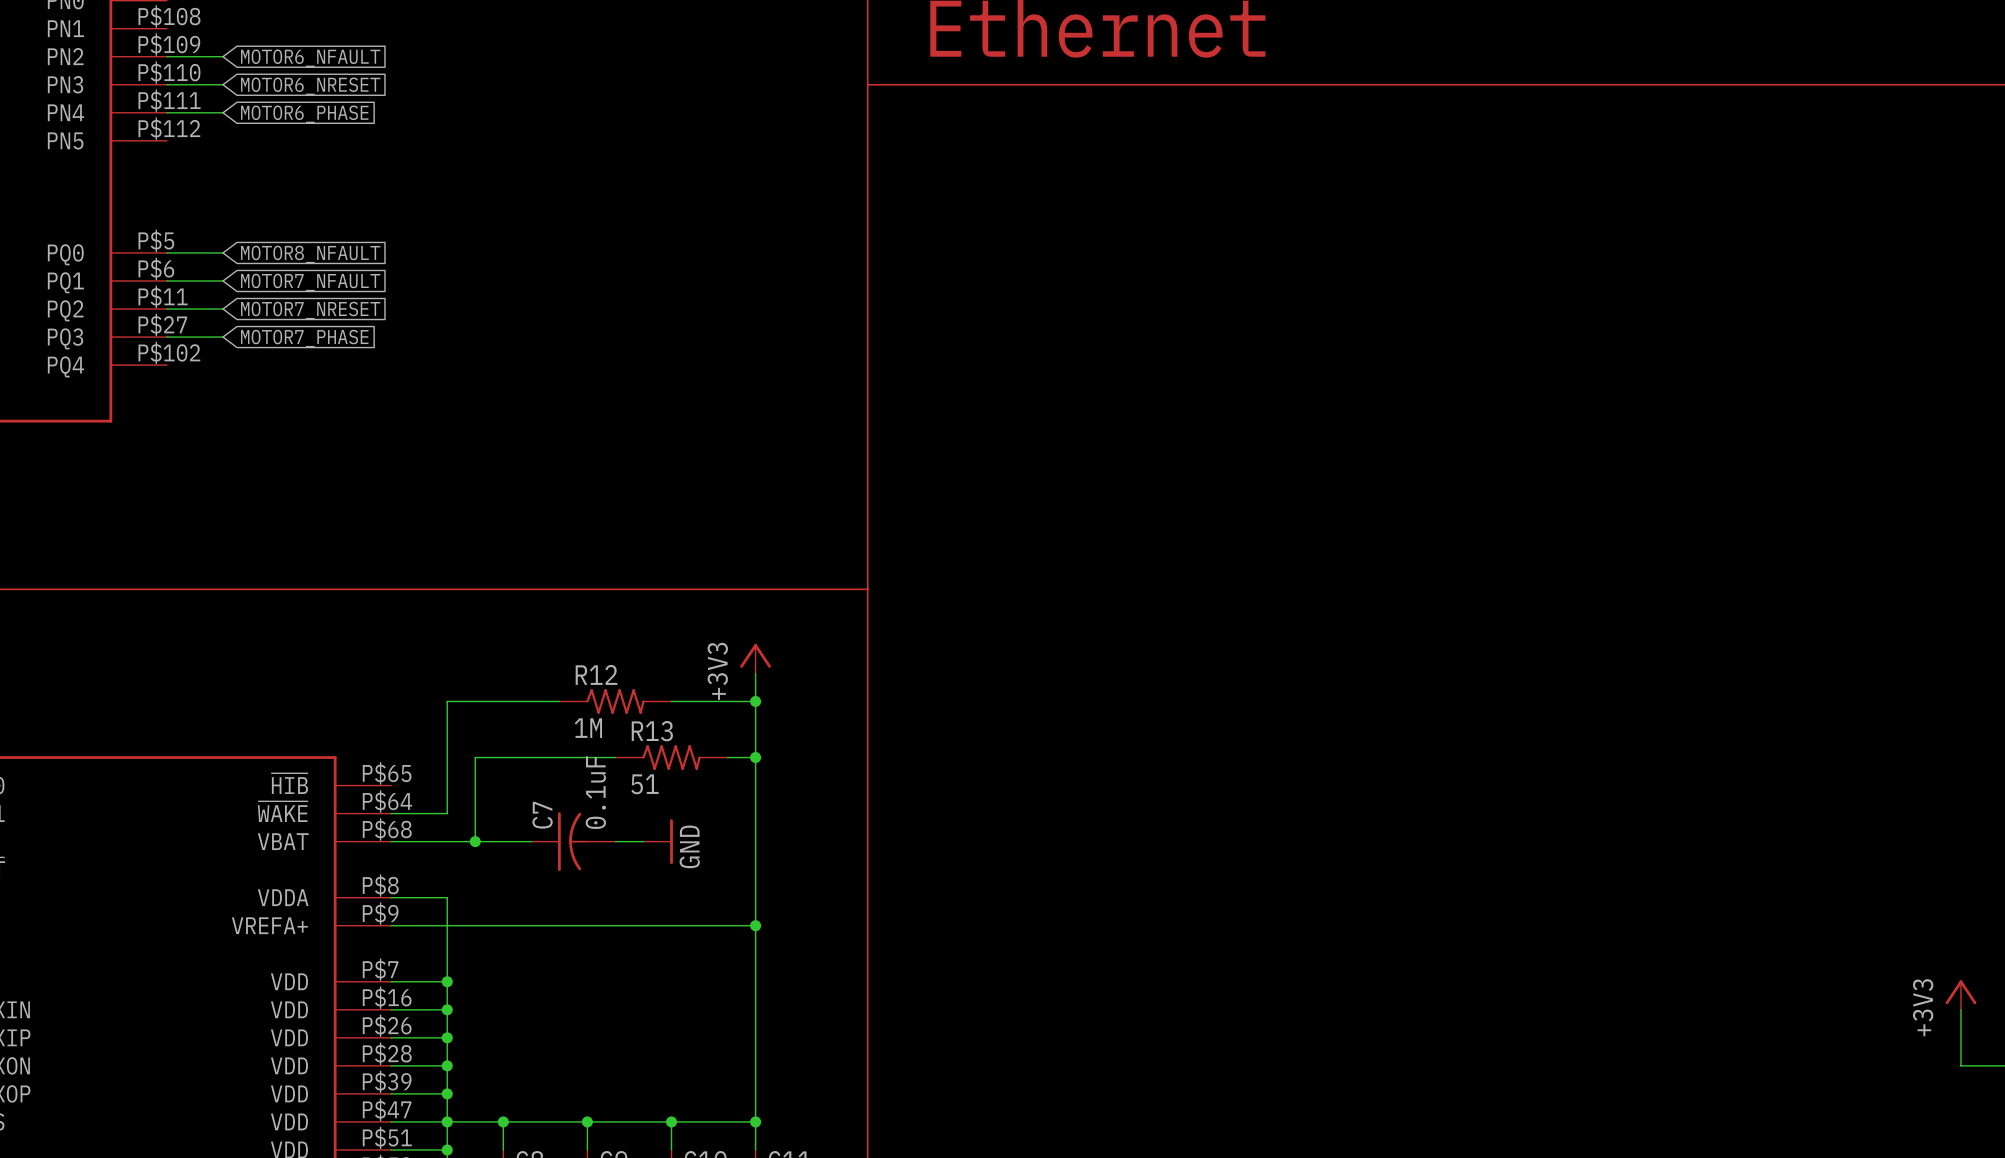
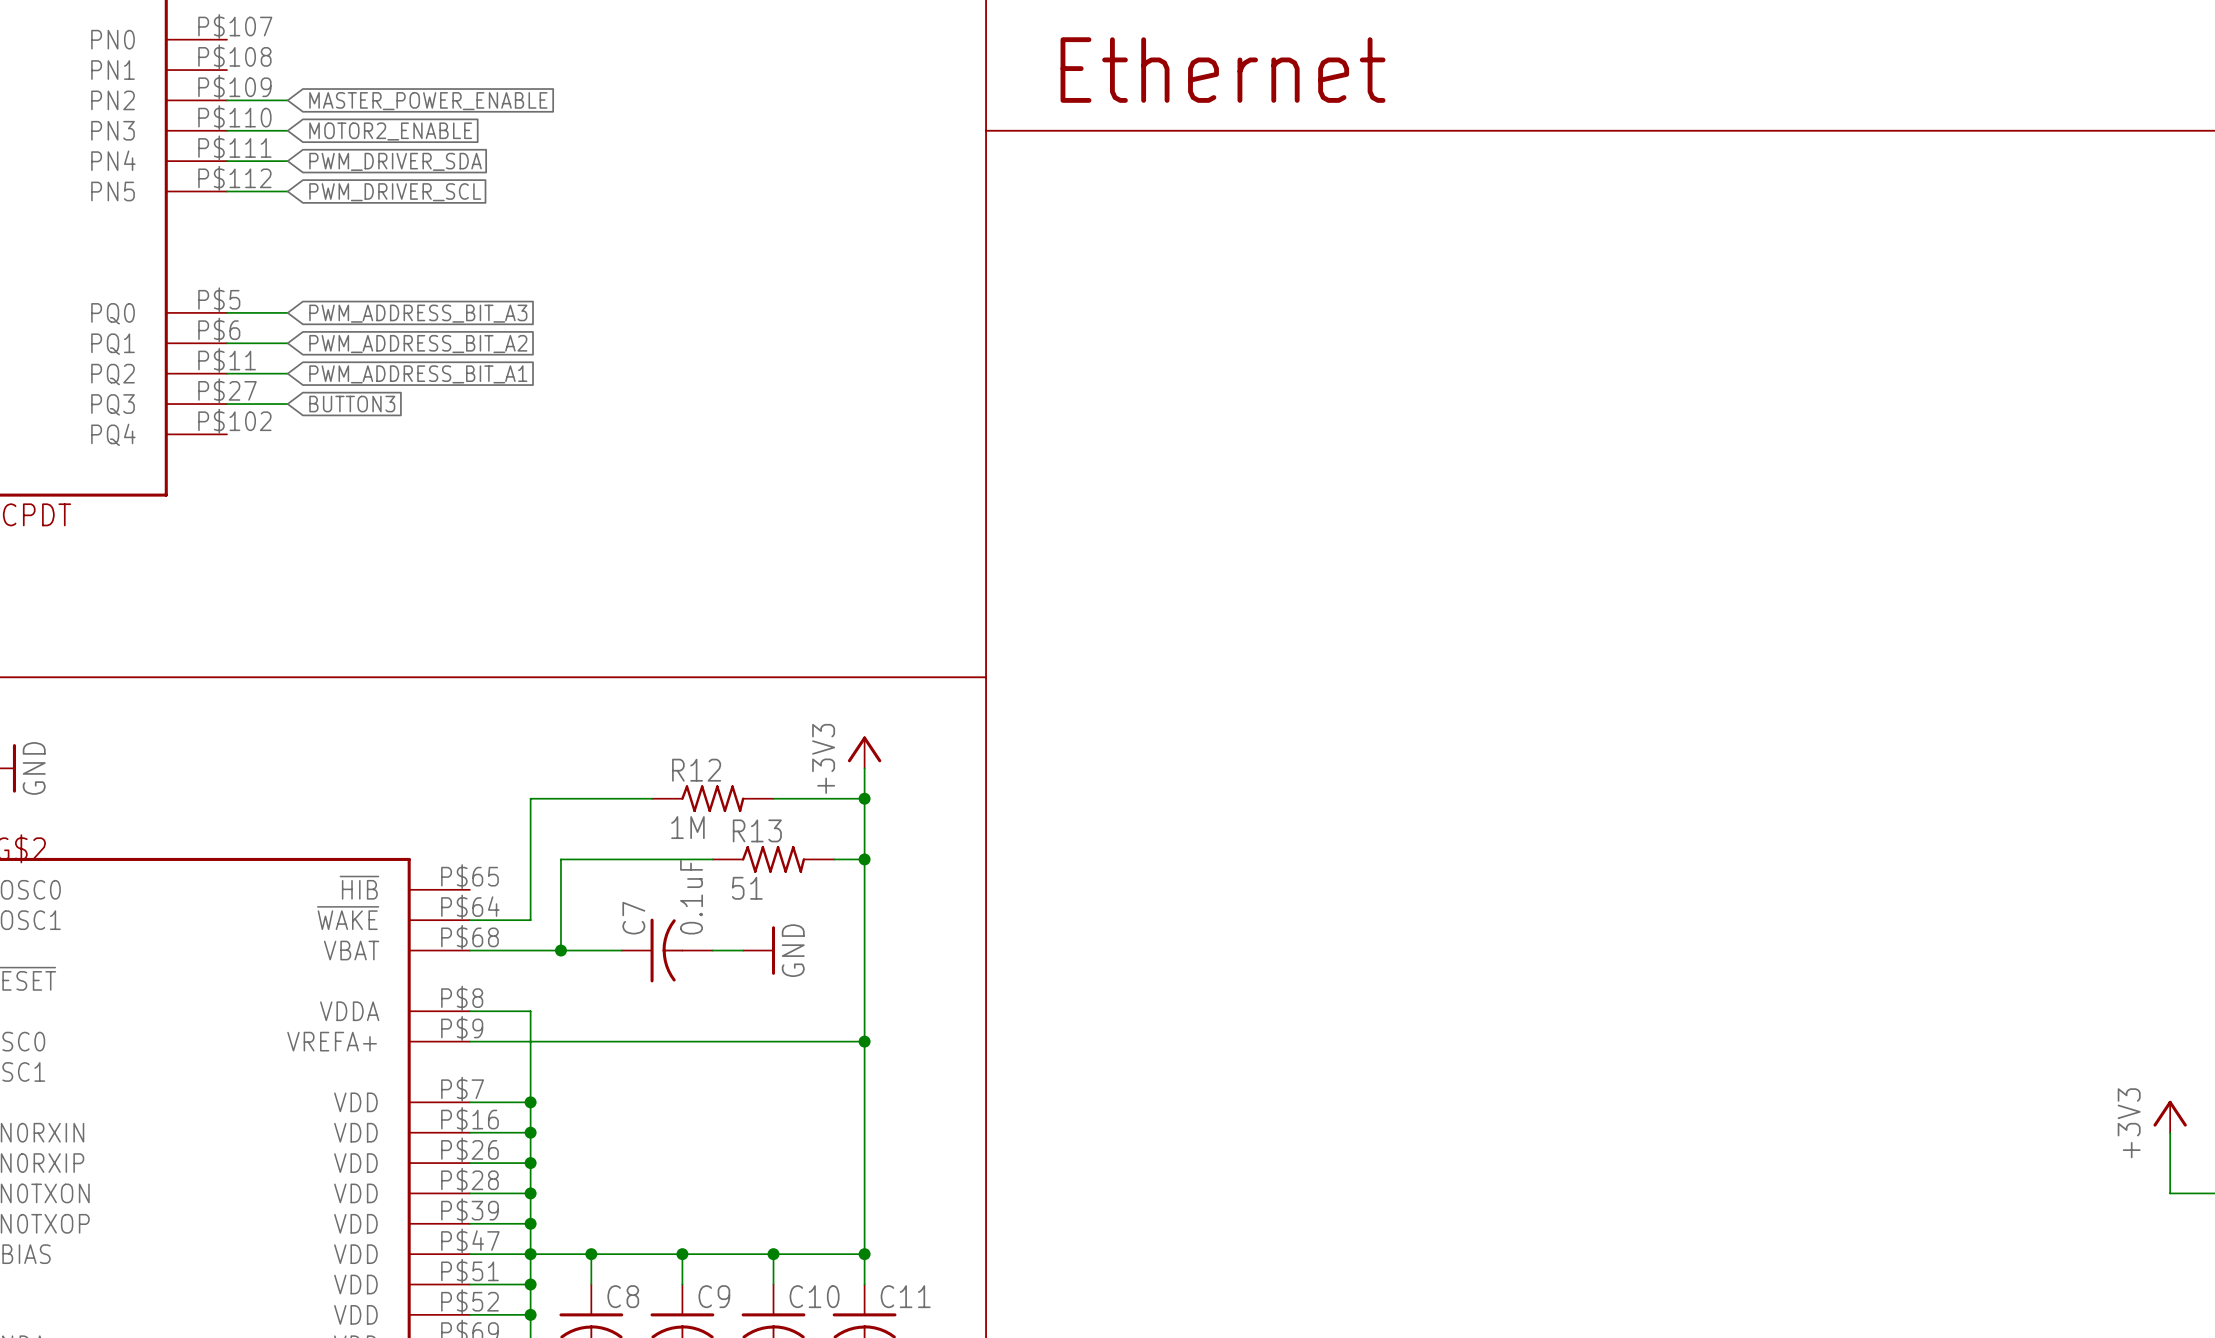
global label: MOTOR6_NFAULT (310, 58) -> MASTER_POWER_ENABLE (428, 101)
global label: MOTOR6_NRESET (310, 86) -> MOTOR2_ENABLE (390, 131)
global label: MOTOR6_PHASE (304, 114) -> PWM_DRIVER_SDA (395, 161)
wire: none -> (226, 191) (287, 191)
global label: none -> PWM_DRIVER_SCL (395, 192)
global label: MOTOR8_NFAULT (310, 254) -> PWM_ADDRESS_BIT_A3 (418, 313)
global label: MOTOR7_NFAULT (310, 282) -> PWM_ADDRESS_BIT_A2 (418, 344)
global label: MOTOR7_NRESET (310, 310) -> PWM_ADDRESS_BIT_A1 (418, 374)
global label: MOTOR7_PHASE (304, 338) -> BUTTON3 (352, 404)

